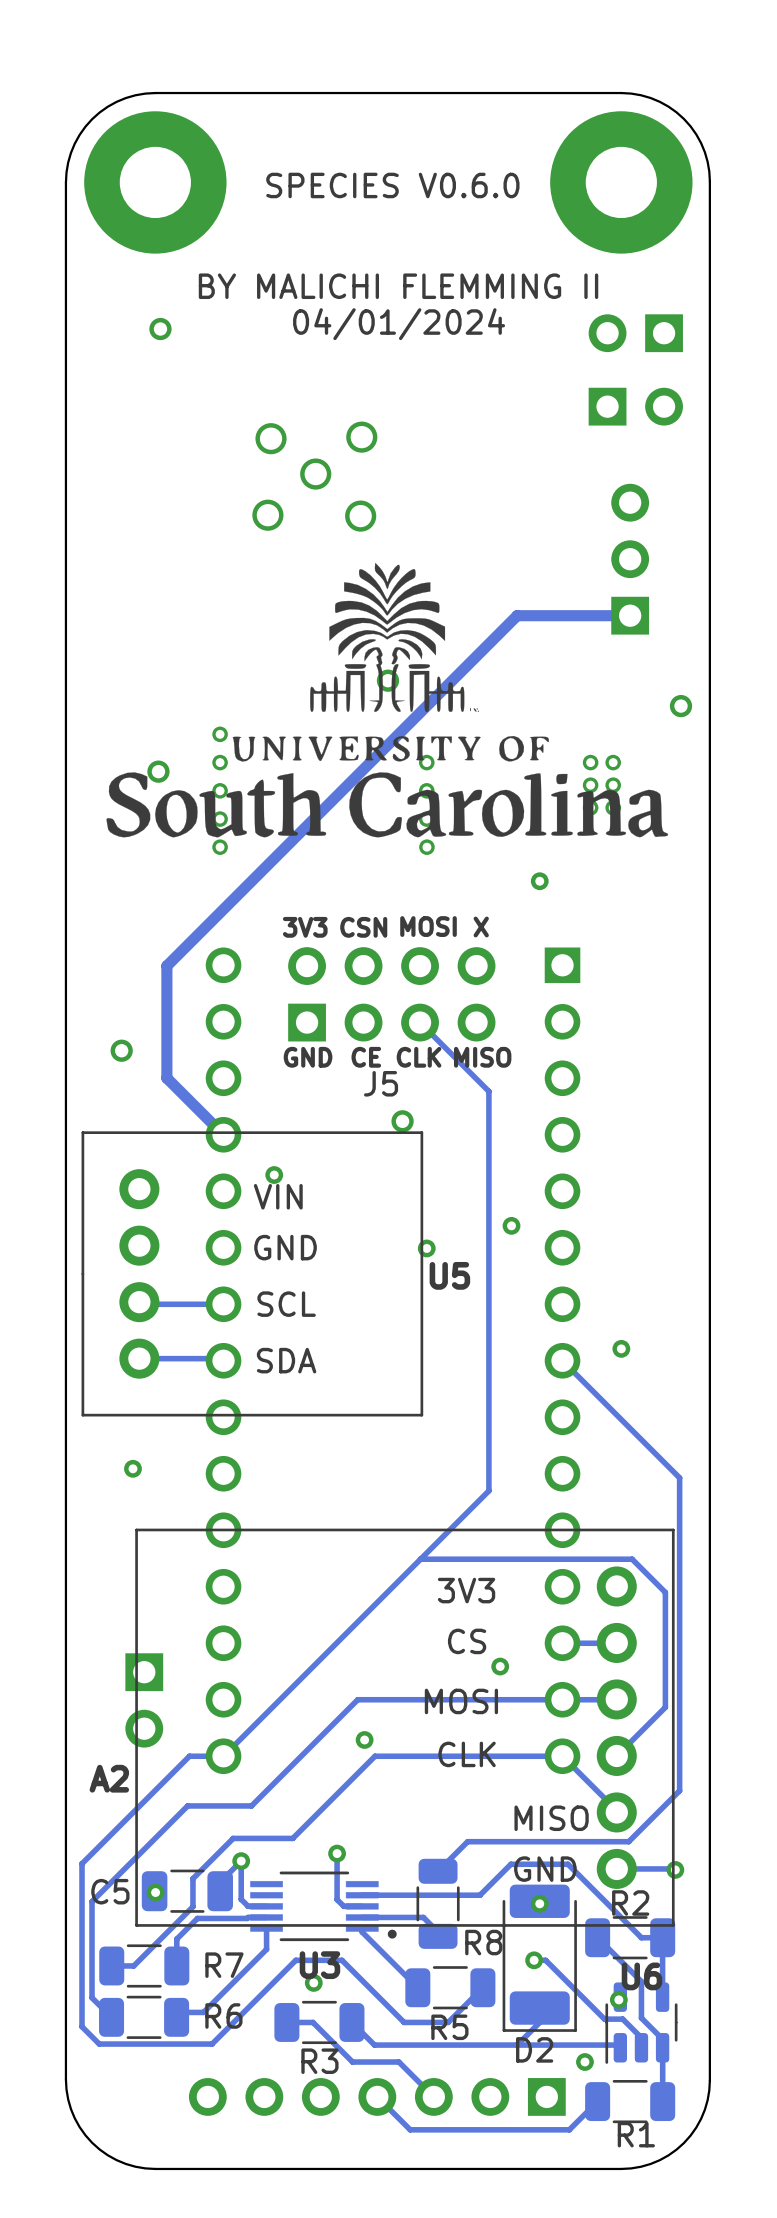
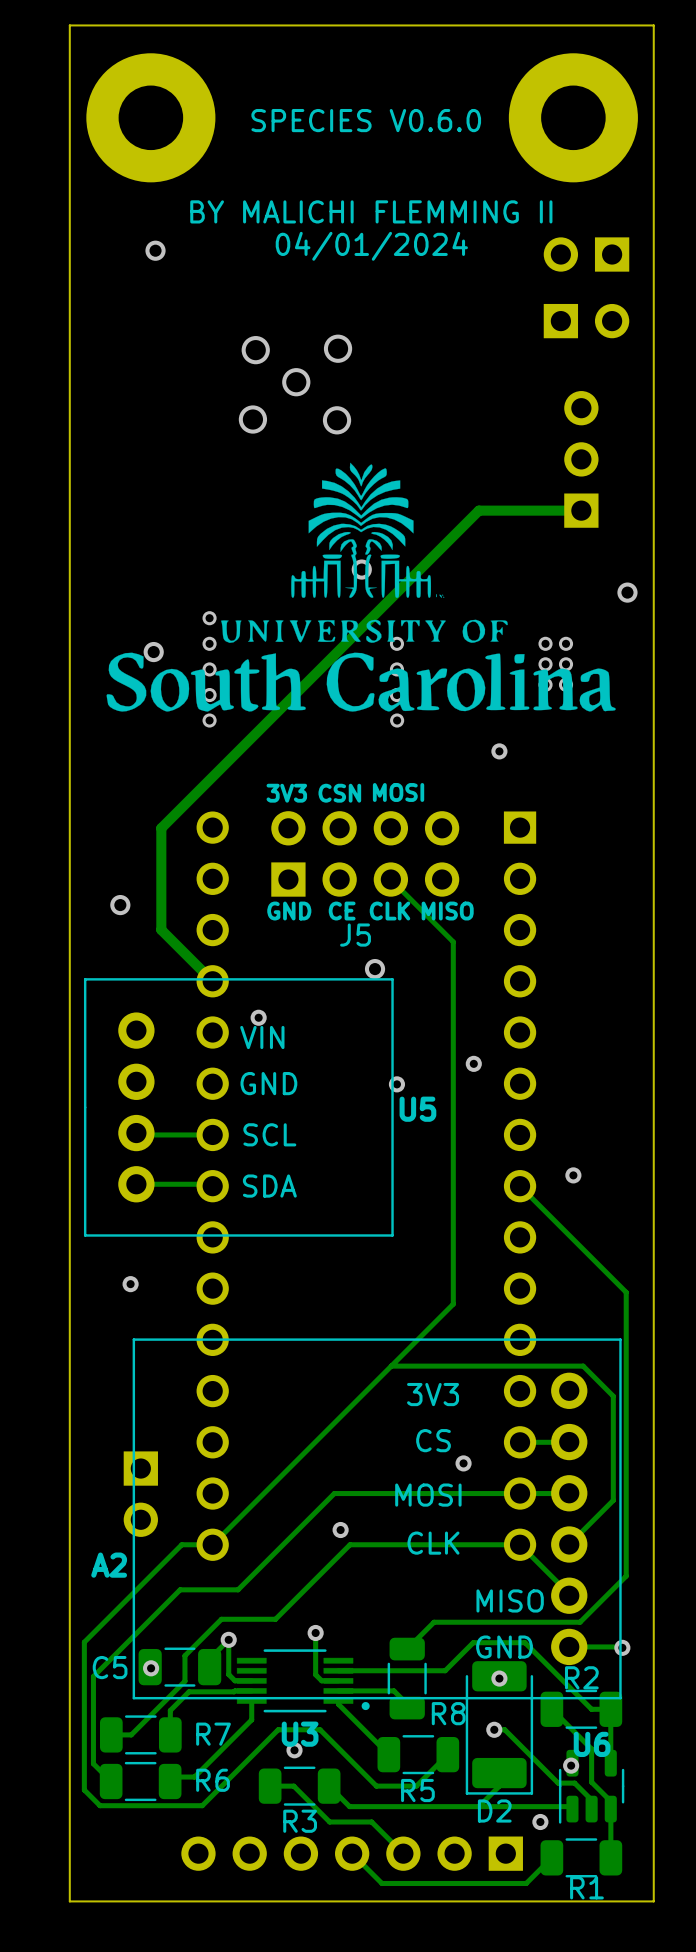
board edge: (65, 182) (70, 152) (79, 134) (92, 119) (107, 106) (125, 98) (155, 93) (631, 93) (659, 101) (676, 112) (690, 126) (704, 152) (709, 181) (709, 2080) (704, 2109) (696, 2127) (676, 2149) (650, 2163) (631, 2168) (155, 2168) (125, 2163) (107, 2155) (92, 2142) (74, 2118) (68, 2099) (65, 2079) -> (69, 117) (69, 25) (653, 25) (653, 1901) (69, 1901) (69, 1837)
text: X (481, 926) -> none

